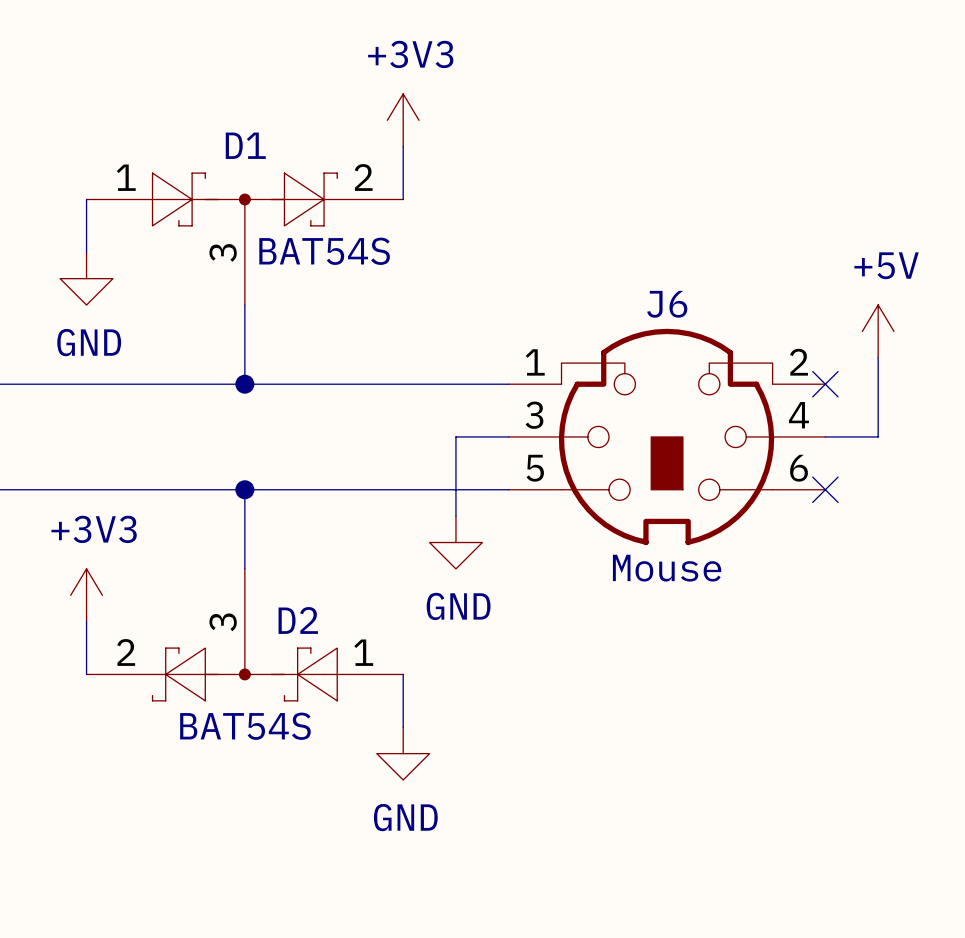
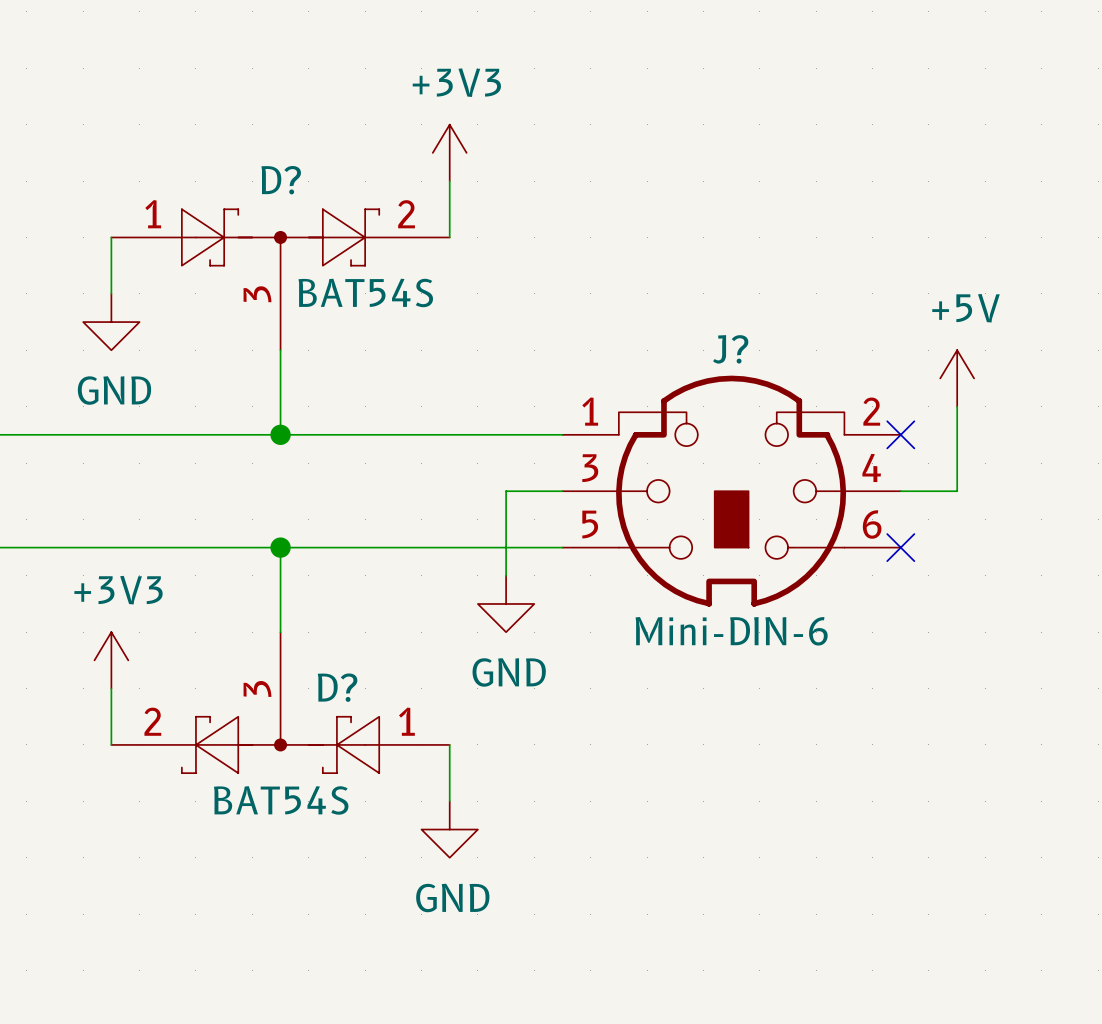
D1 name: D1 (245, 145) -> D? (281, 180)
J6 name: J6 (667, 304) -> J? (730, 349)
J6 value: Mouse (667, 568) -> Mini-DIN-6 (731, 631)
D2 name: D2 (298, 620) -> D? (337, 687)

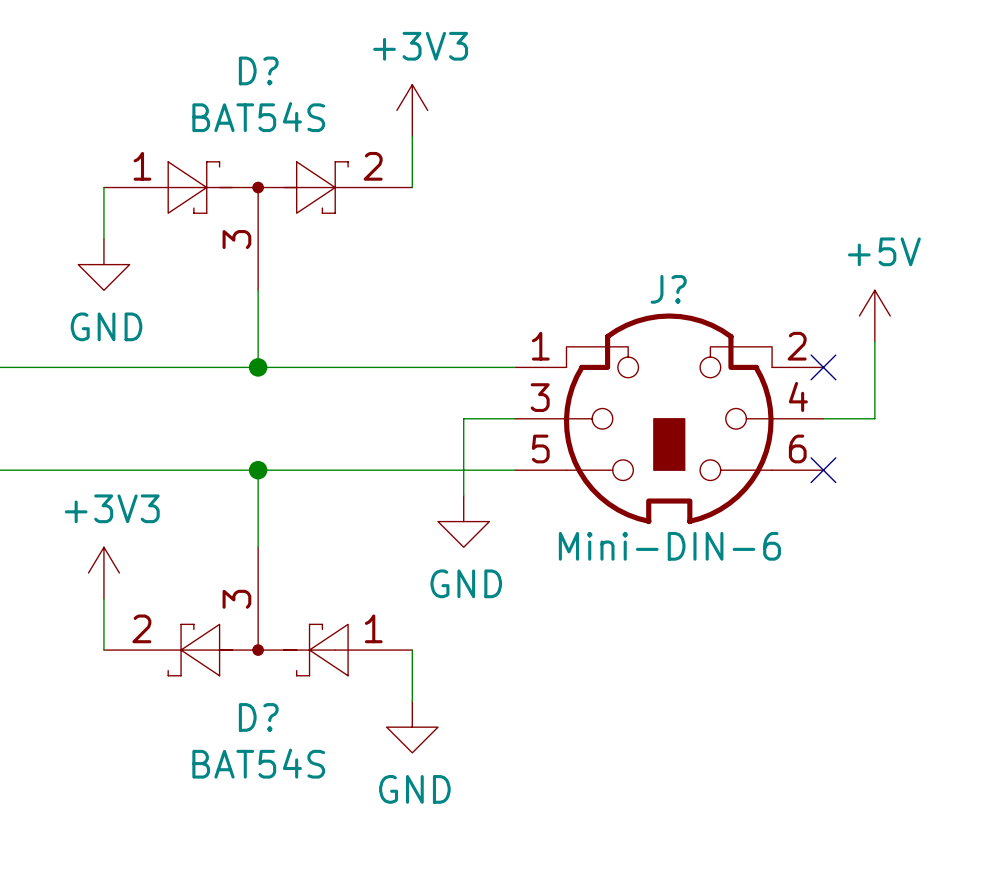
D? name position: D? (281, 180) -> D? (258, 70)
D? value position: BAT54S (365, 292) -> BAT54S (258, 117)
D? name position: D? (337, 687) -> D? (258, 717)
D? value position: BAT54S (281, 800) -> BAT54S (258, 763)

